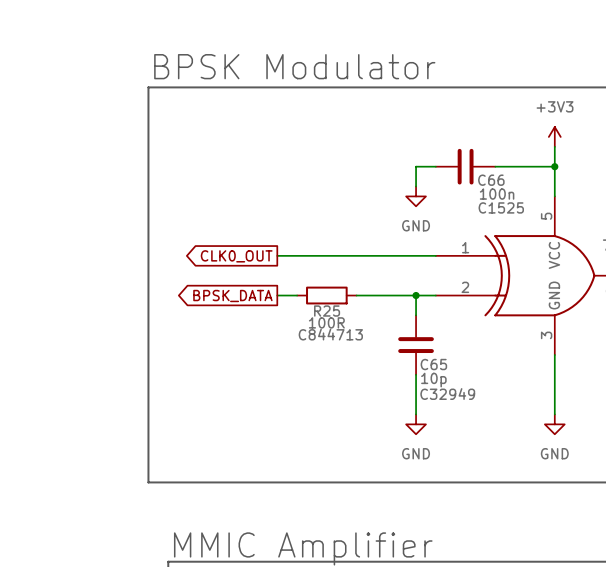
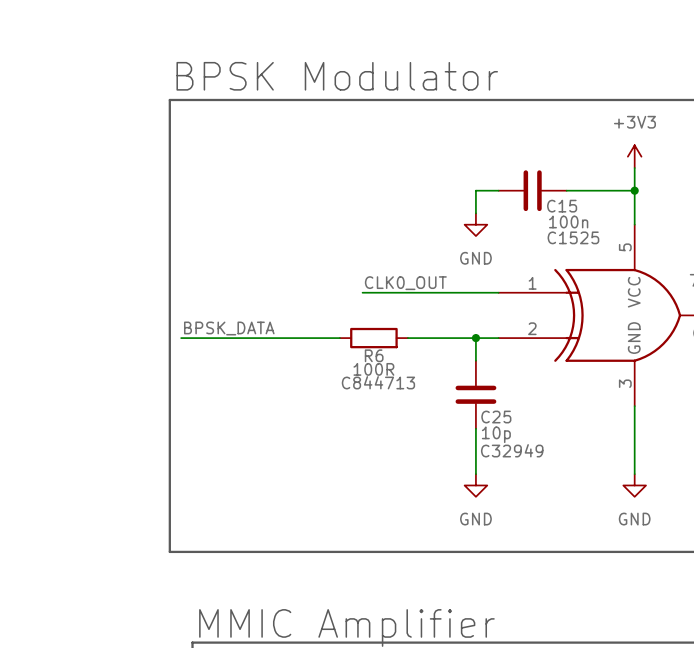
C66 name: C66 (491, 180) -> C15 (562, 206)
label: none -> CLK0_OUT (405, 283)
wire: (277, 255) (316, 255) -> none
global label: CLK0_OUT (236, 256) -> none
label: none -> BPSK_DATA (229, 328)
wire: none -> (181, 338) (317, 338)
global label: BPSK_DATA (232, 296) -> none
R25 name: R25 (327, 311) -> R6 (374, 355)
C65 name: C65 (433, 364) -> C25 (496, 417)

